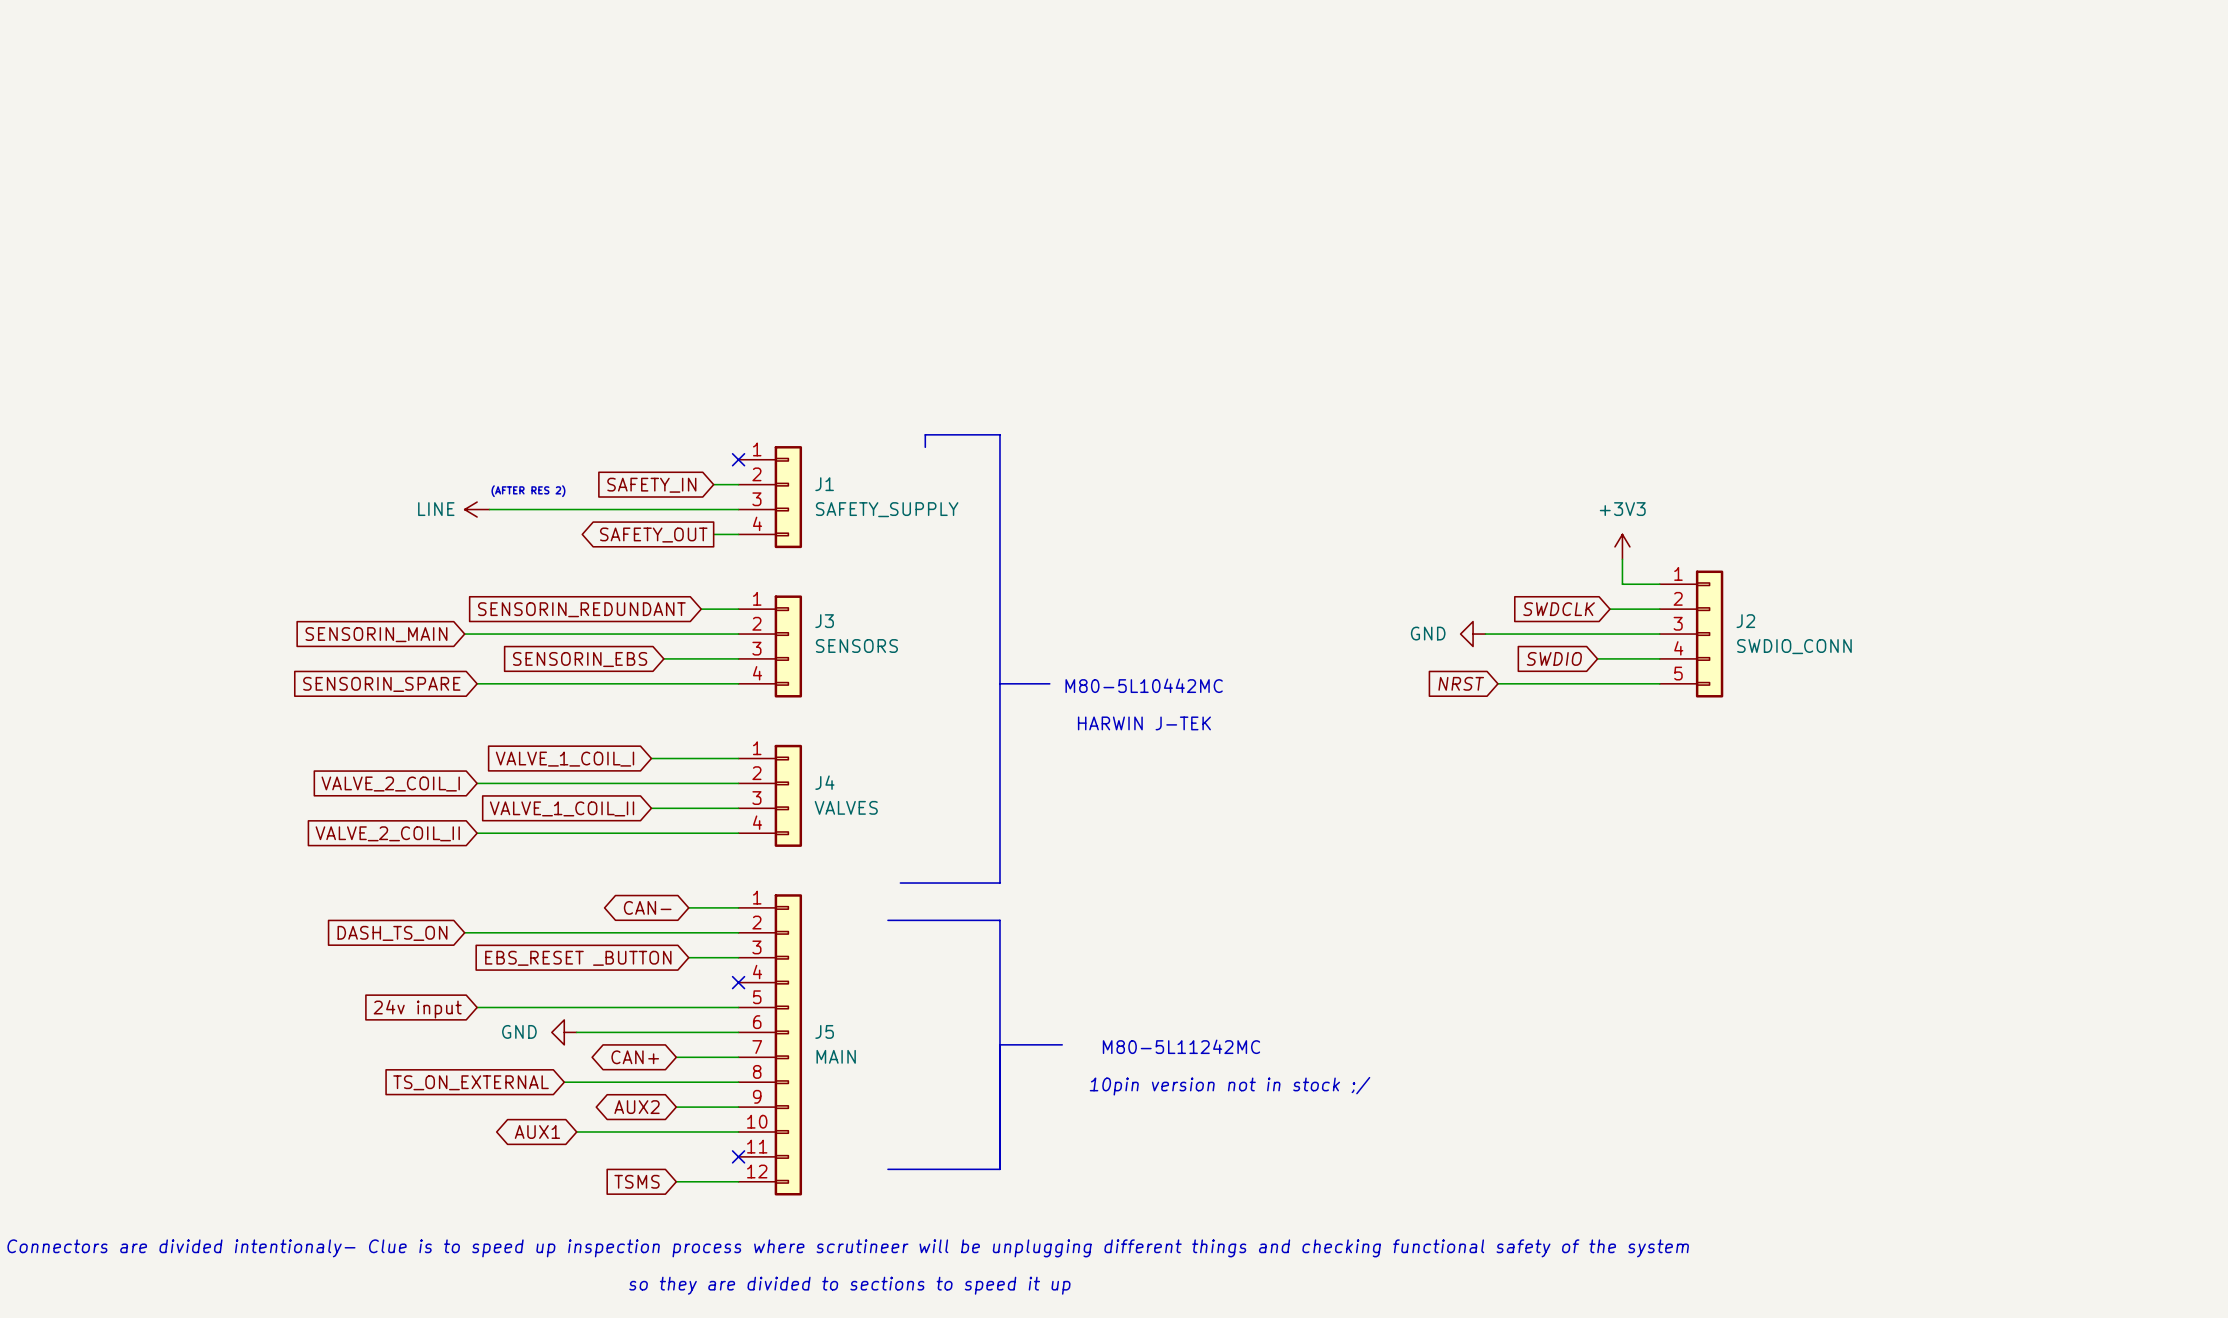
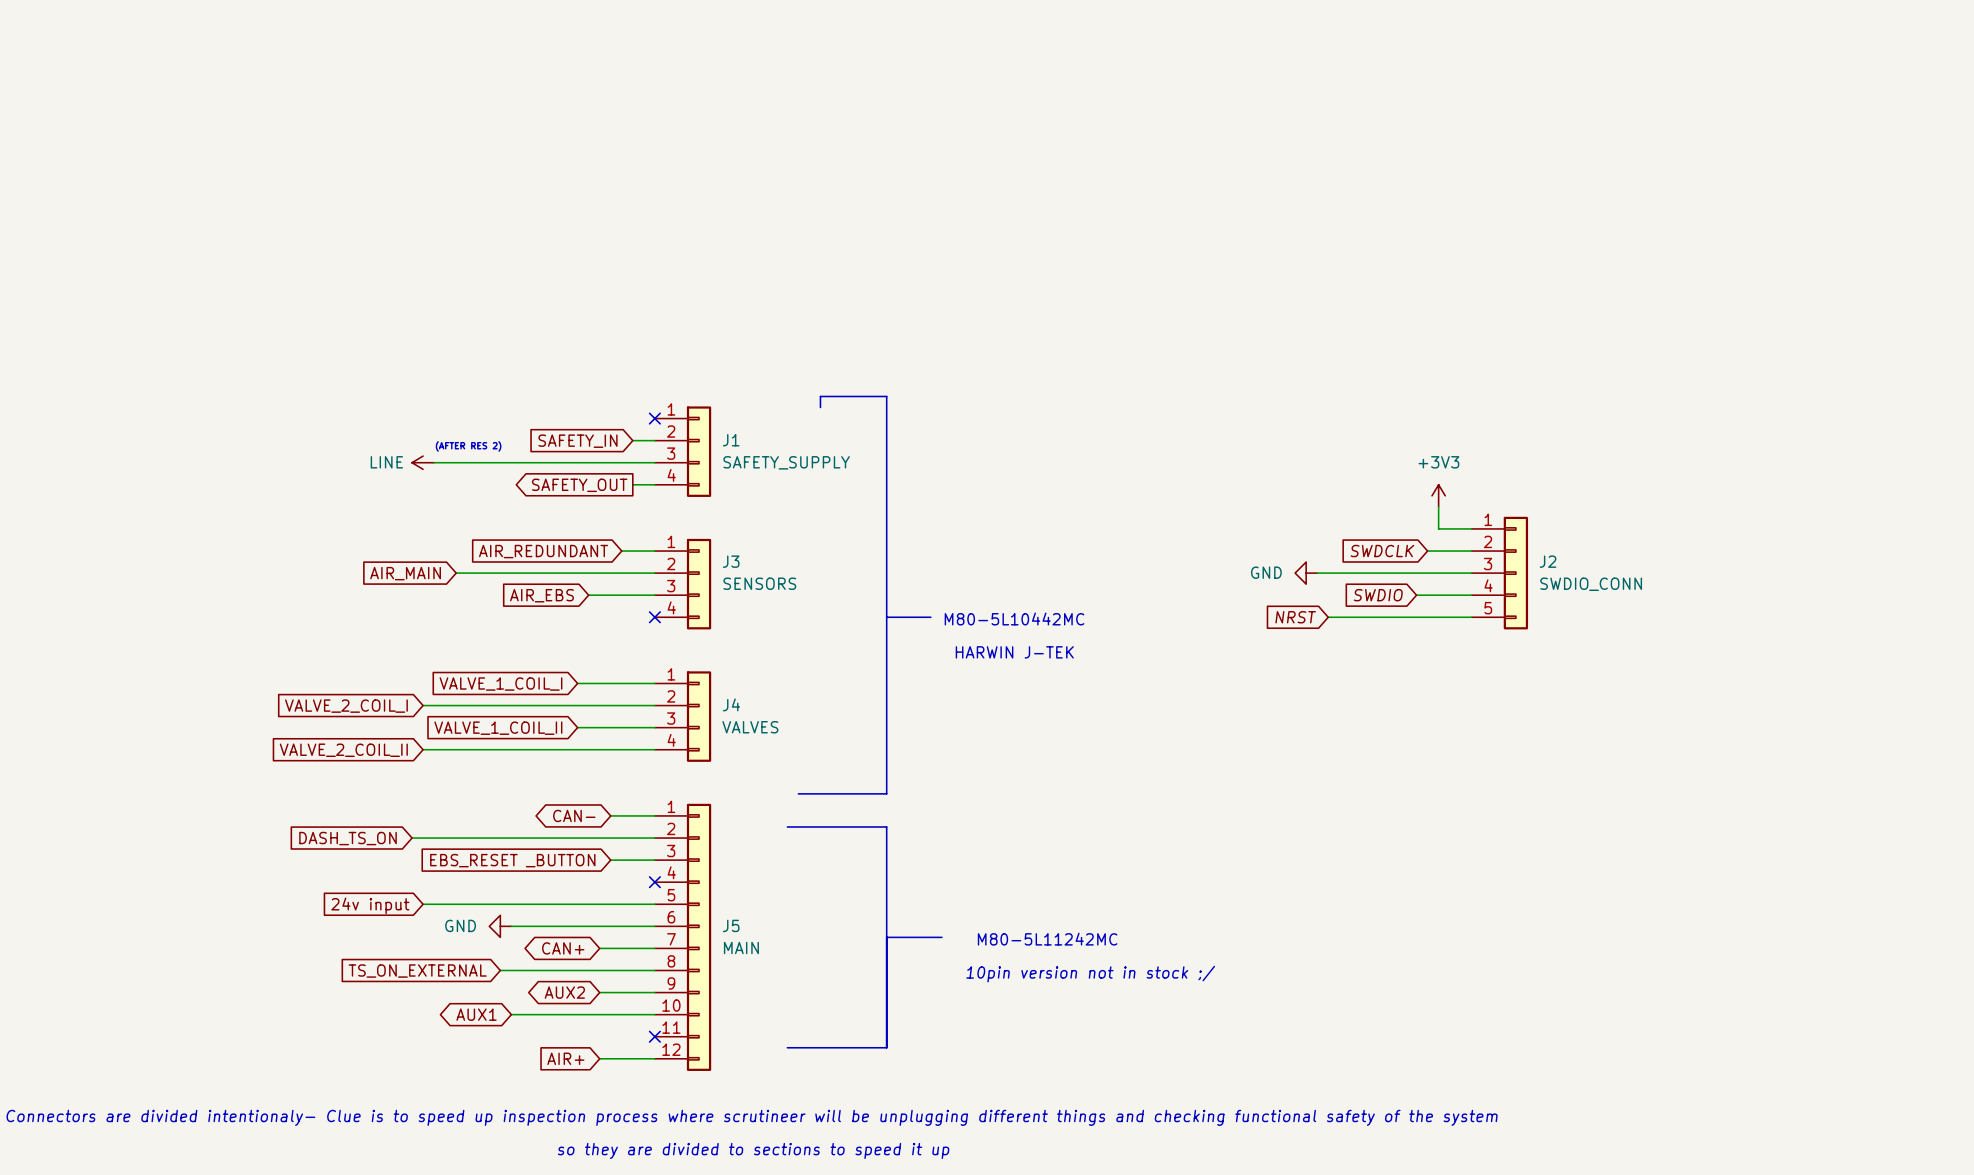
global label: SENSORIN_REDUNDANT (581, 609) -> AIR_REDUNDANT (543, 551)
global label: SENSORIN_MAIN (376, 634) -> none
global label: none -> AIR_MAIN (405, 573)
wire: (464, 634) (514, 634) -> none
global label: SENSORIN_EBS (580, 659) -> AIR_EBS (541, 595)
wire: (477, 683) (738, 683) -> none
no-connect mark: none -> (654, 617)
global label: SENSORIN_SPARE (381, 684) -> none
global label: TSMS (637, 1181) -> AIR+ (565, 1058)

